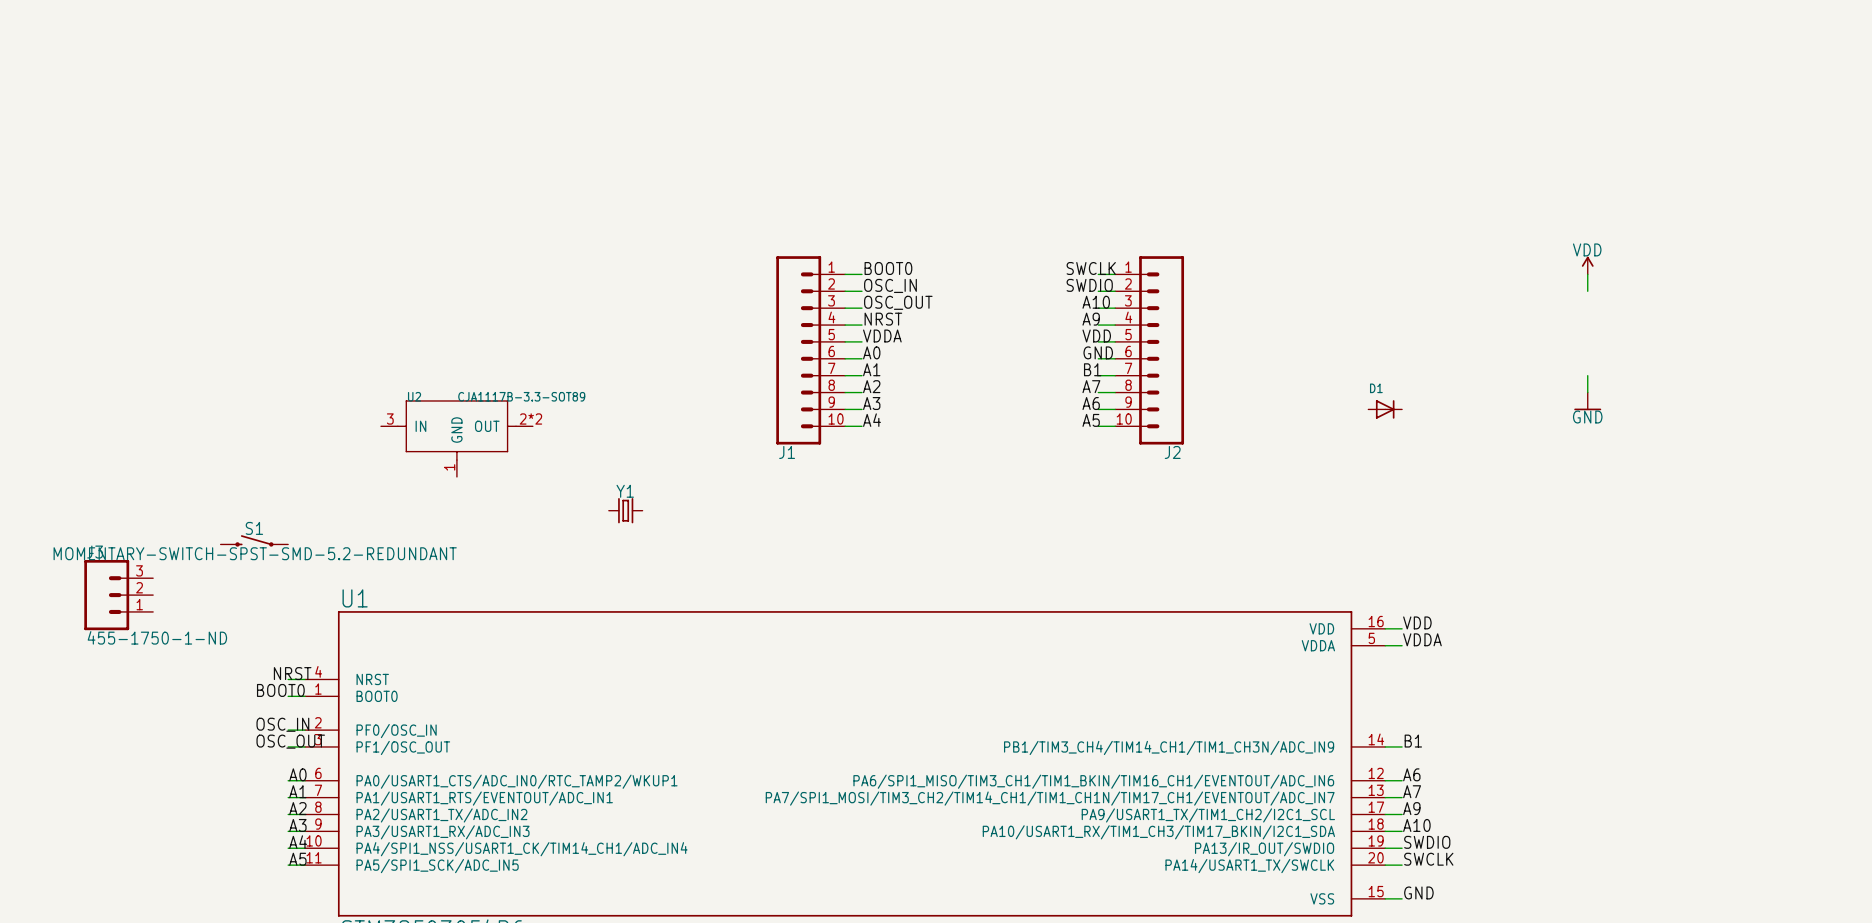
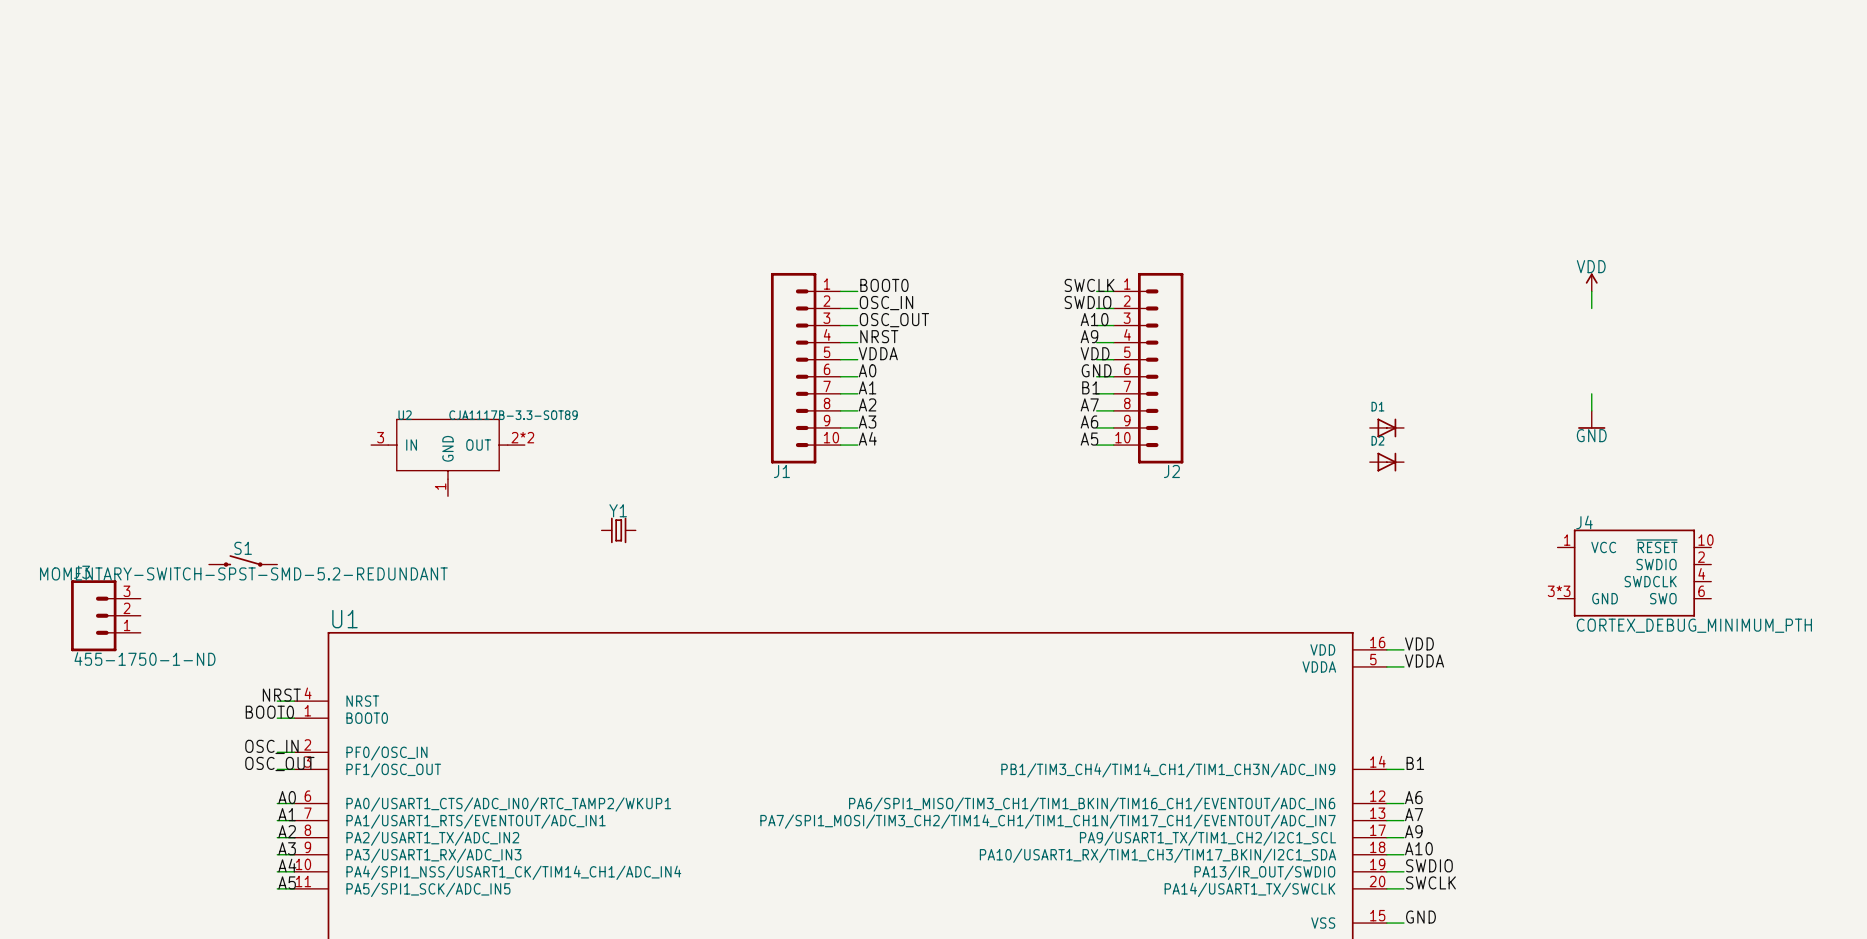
D2: none -> (1386, 462)
J4: none -> CORTEX_DEBUG_MINIMUM_PTH (1634, 573)

